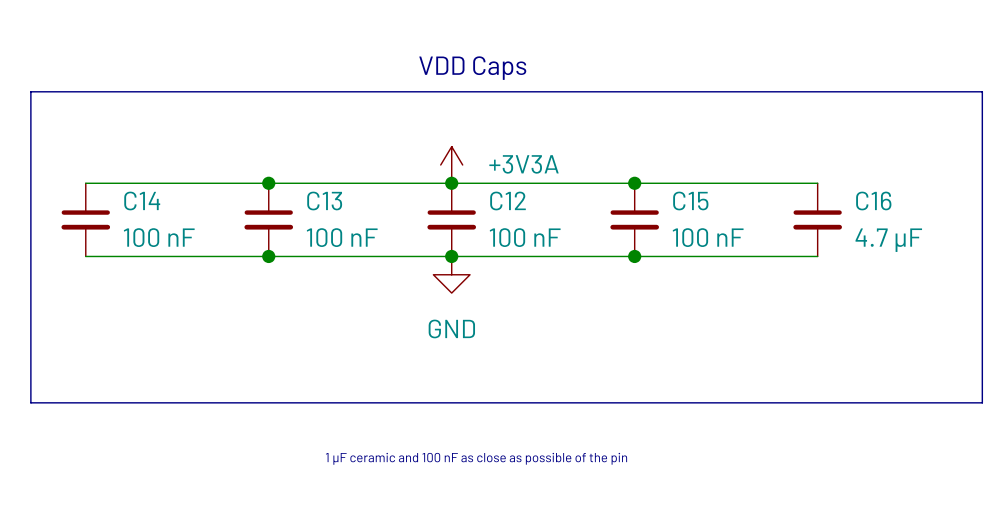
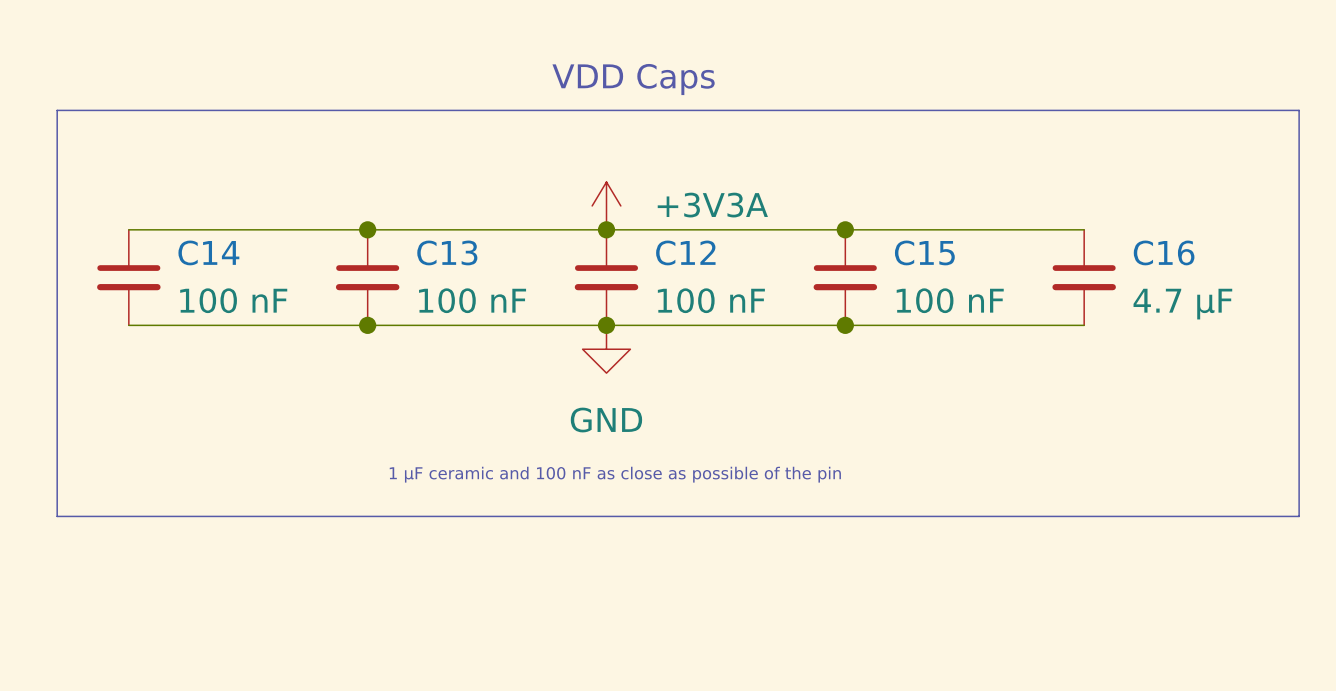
text position: 1 μF ceramic and 100 nF as close as possible of the pin (476, 458) -> 1 μF ceramic and 100 nF as close as possible of the pin (615, 474)

